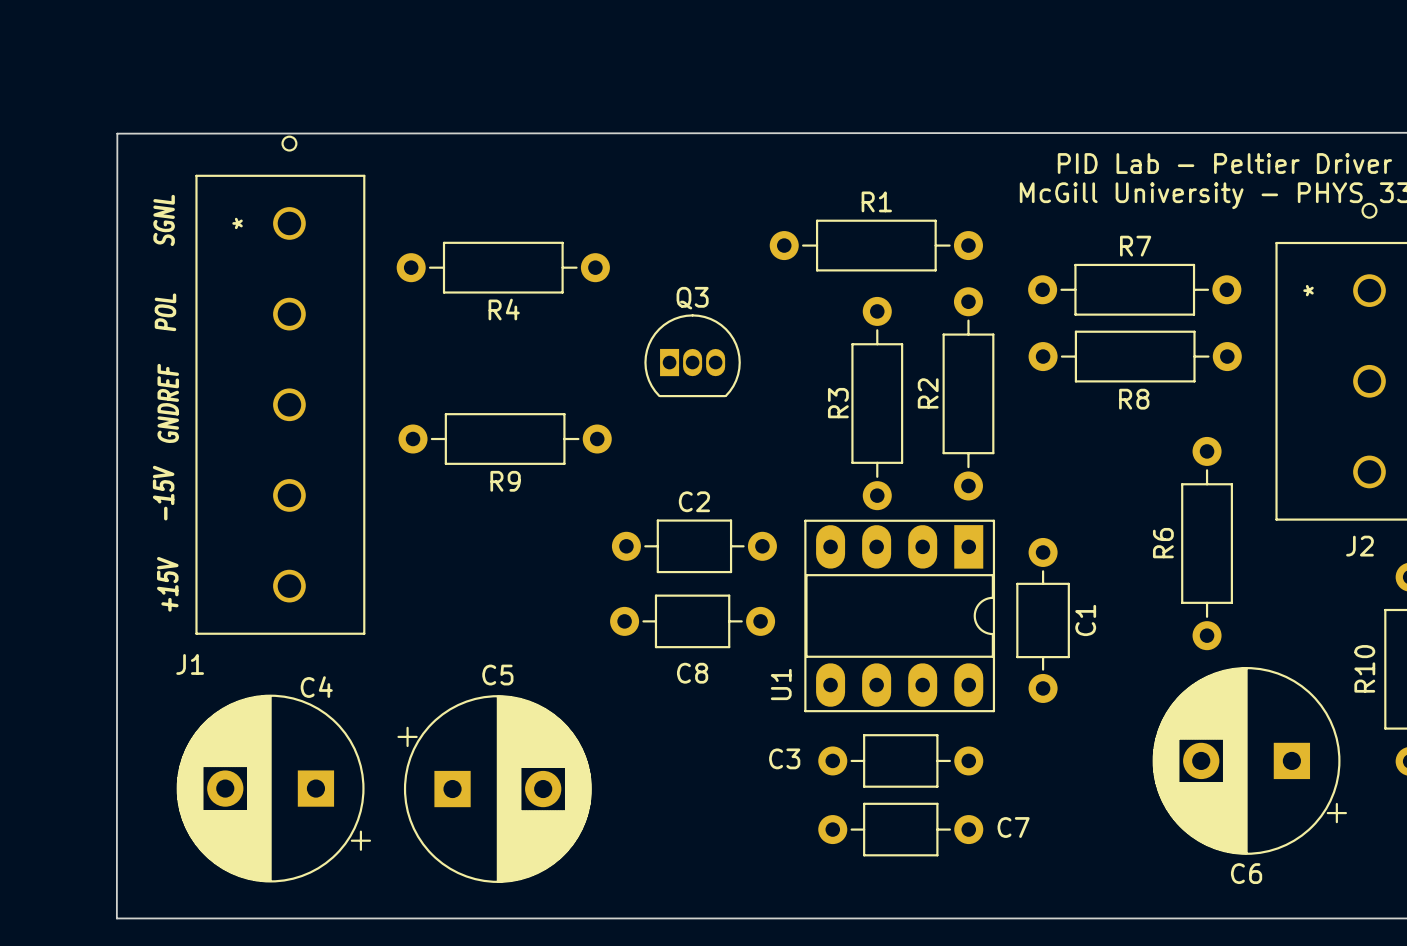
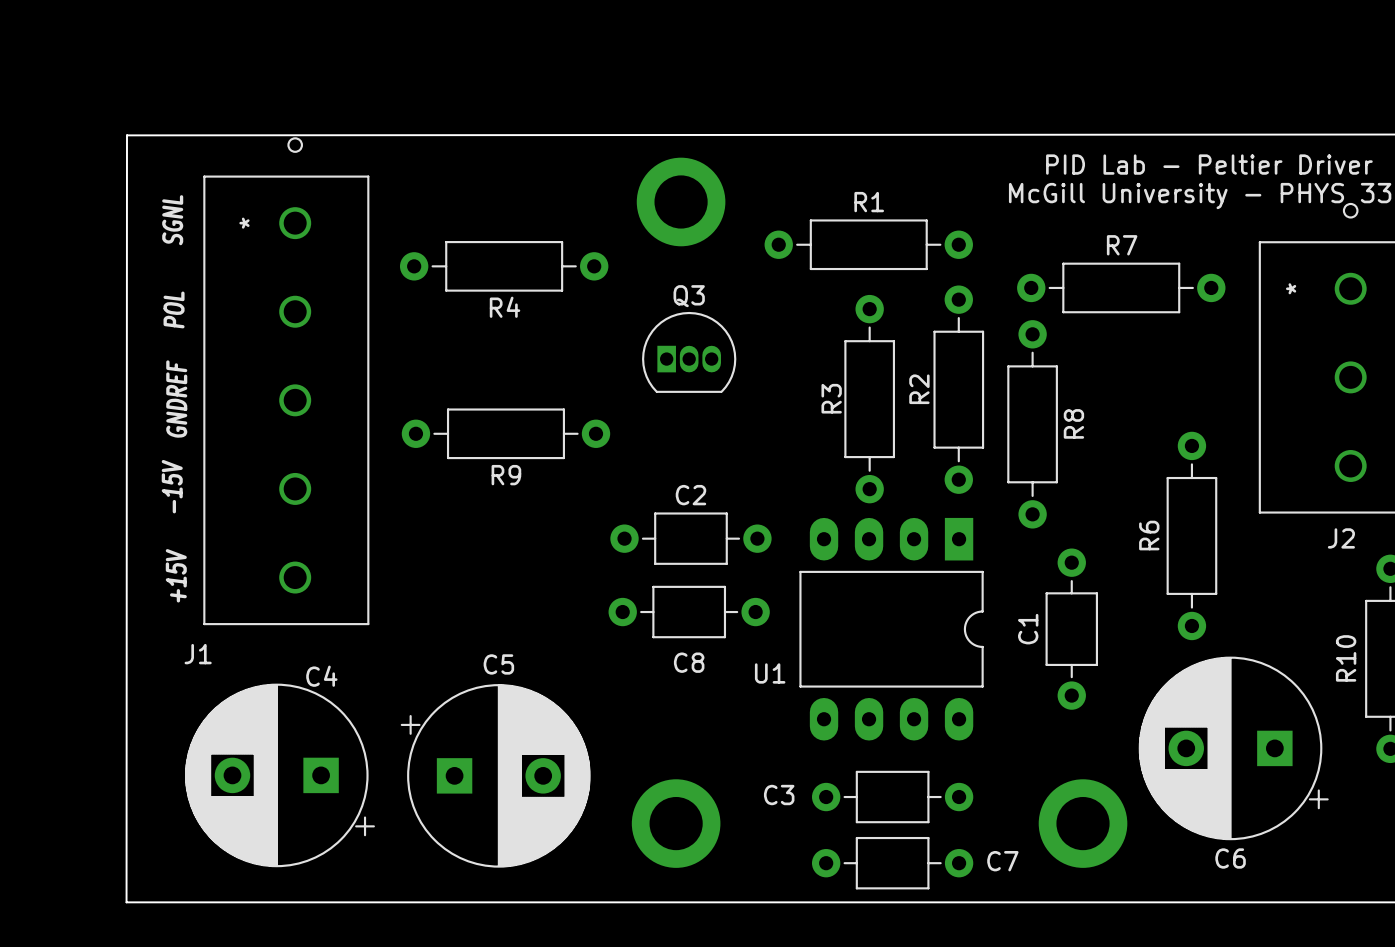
part: none -> (681, 201)
R8 rotation: 0° (1135, 356) -> 90° clockwise (1032, 424)
R8 name position: R8 (1134, 399) -> R8 (1073, 423)
U1 footprint: [804, 519, 996, 713] -> [799, 517, 984, 741]
C1 position: (1043, 620) -> (1071, 629)
C1 name position: C1 (1085, 620) -> C1 (1028, 629)
C3 position: (900, 760) -> (892, 797)
C7 position: (900, 829) -> (892, 863)
part: none -> (676, 823)
part: none -> (1083, 823)

